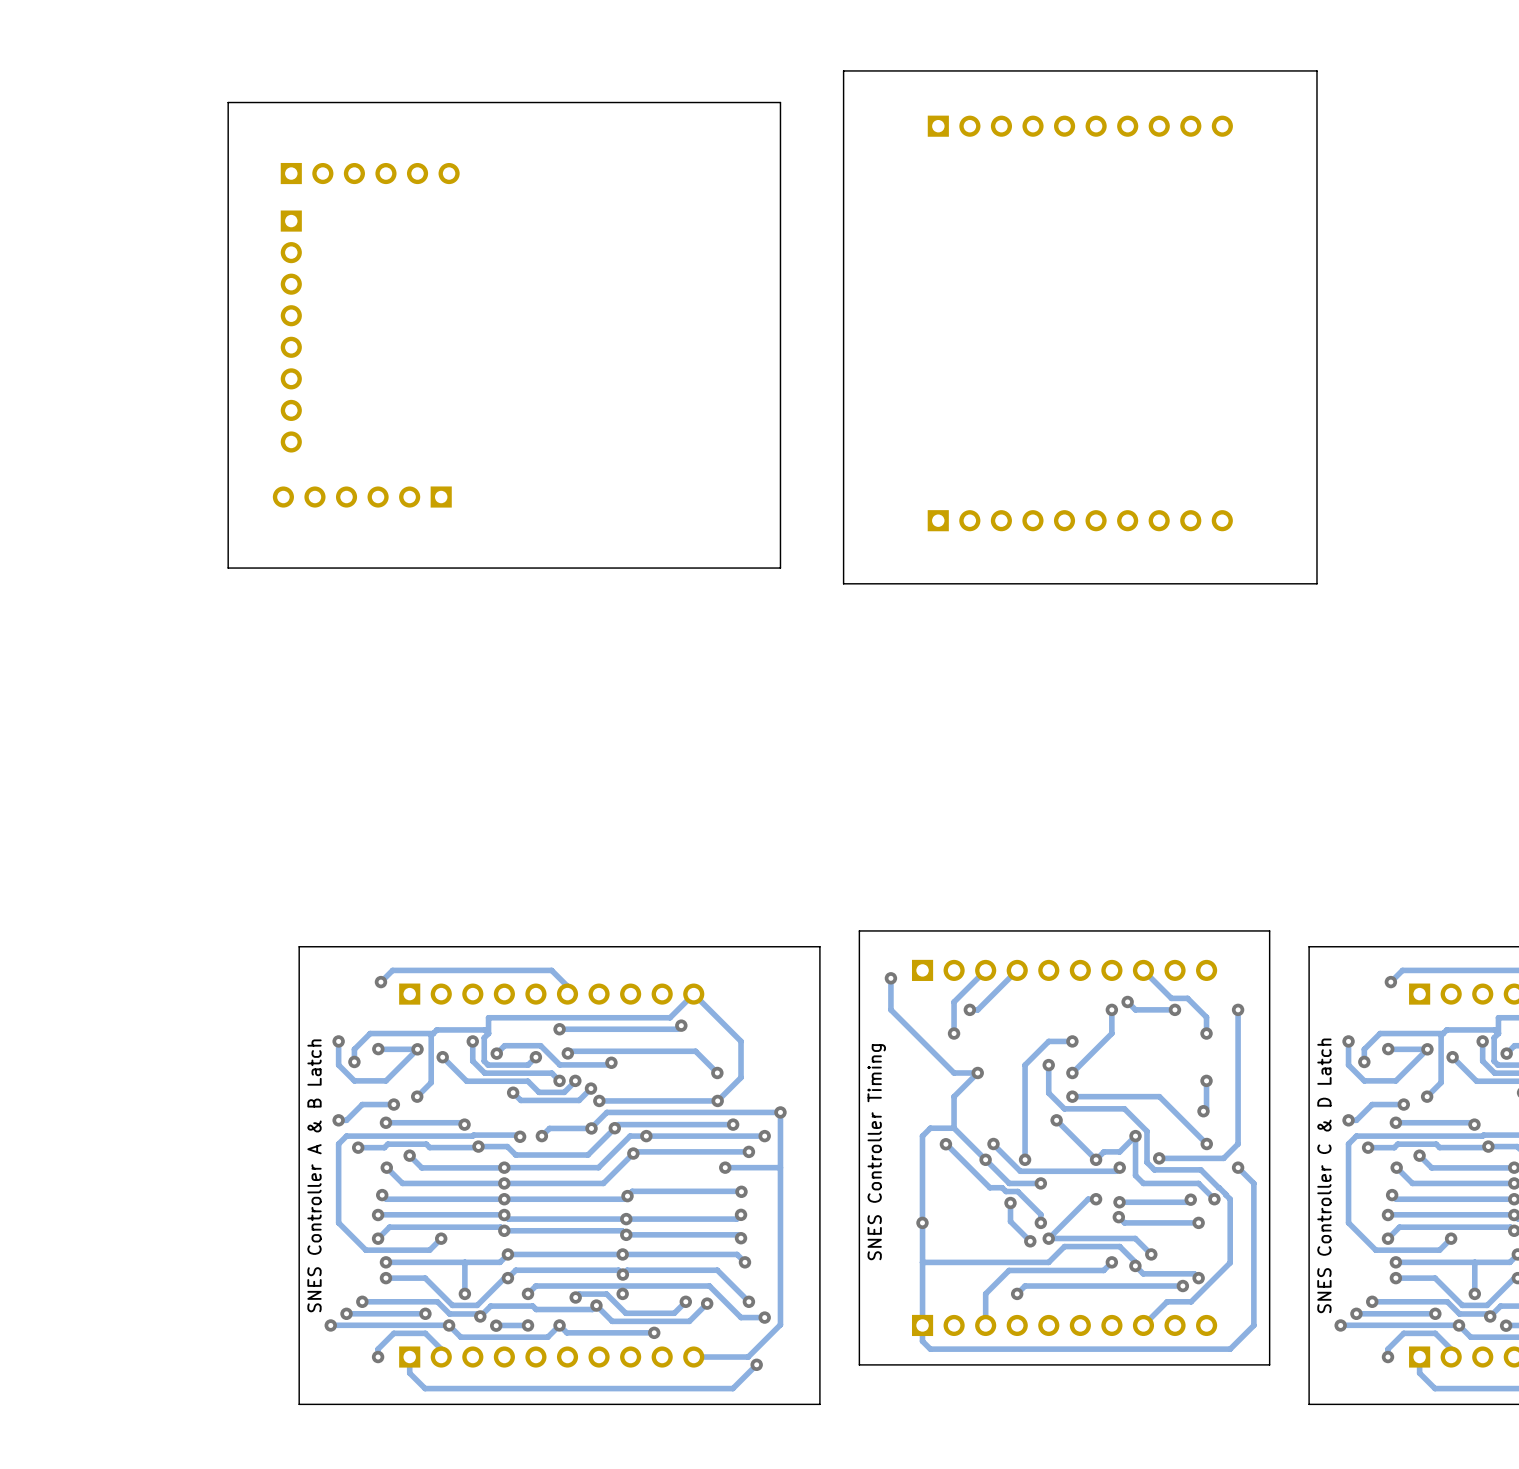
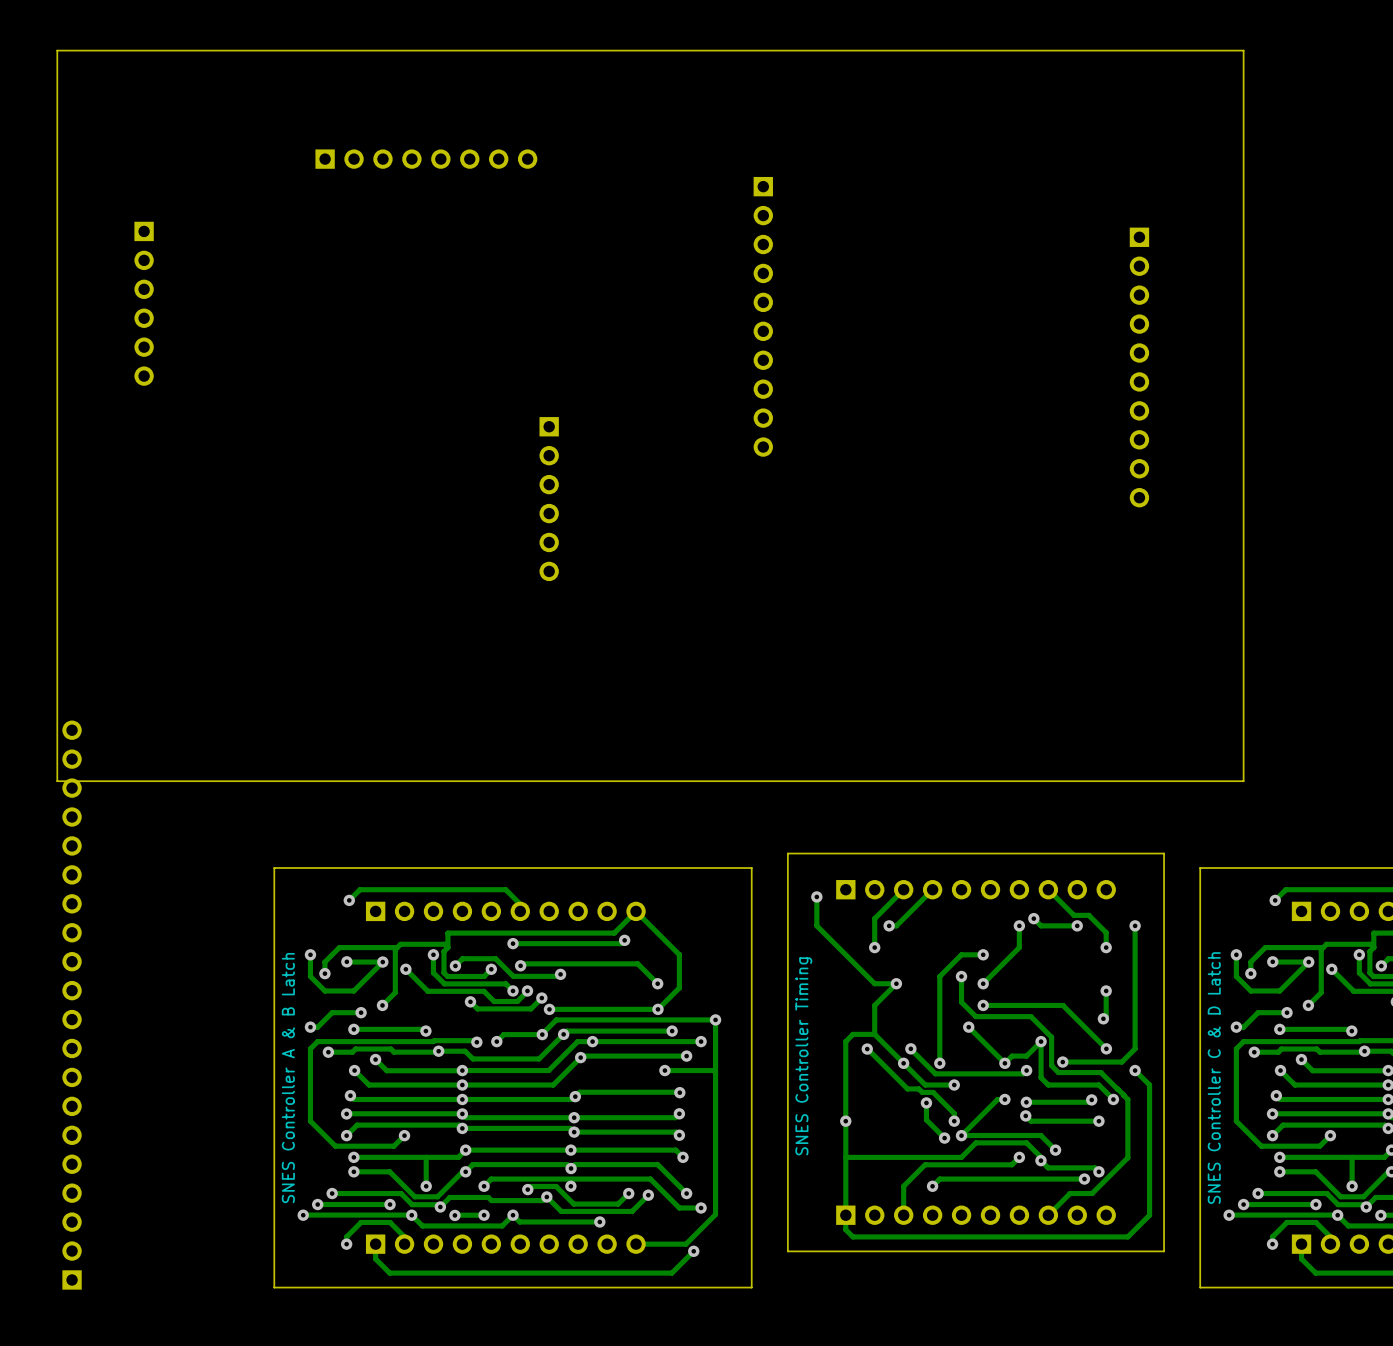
board edge: none -> (1243, 50) (1243, 781) (57, 781) (57, 50) (1243, 50)
board edge: (1316, 70) (1316, 583) (843, 583) (843, 70) (1316, 70) -> none
board edge: (780, 102) (780, 568) (228, 568) (228, 102) (780, 102) -> none
part: (1080, 126) -> none
part: (370, 173) -> none
part: none -> (144, 303)
part rotation: 0° (291, 331) -> 90° counterclockwise (426, 159)
part position: (291, 331) -> (426, 159)
part: none -> (763, 316)
part: none -> (1139, 367)
part: (362, 497) -> none
part: (1080, 520) -> none
part: none -> (549, 499)
part: none -> (72, 1005)

